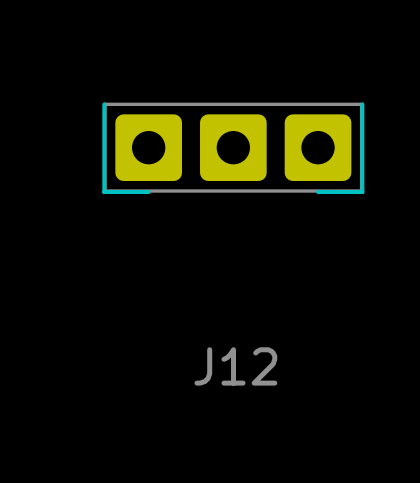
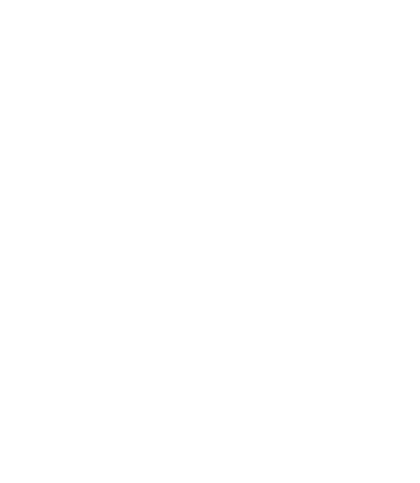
J12: (233, 148) -> none

